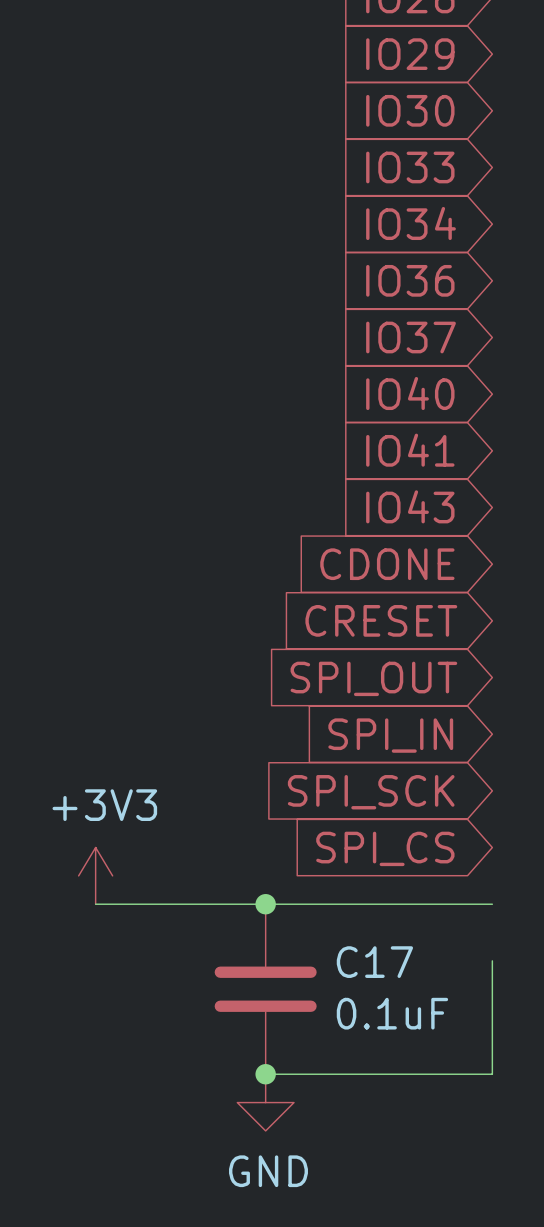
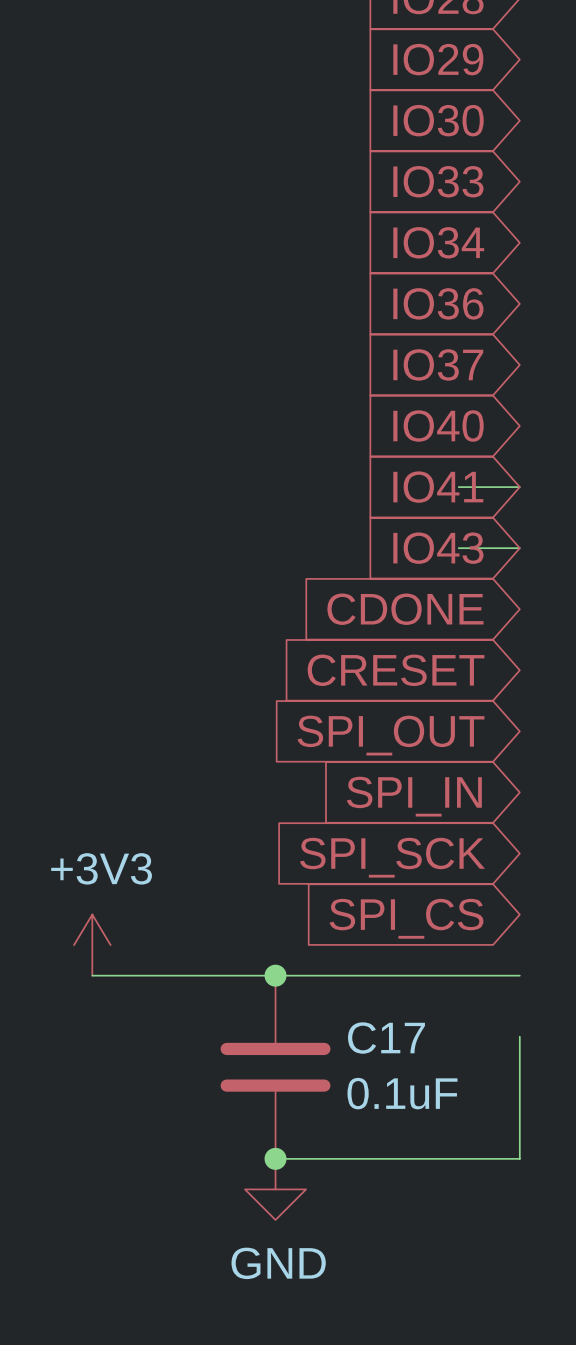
wire: none -> (458, 487) (519, 487)
wire: none -> (458, 548) (519, 548)

